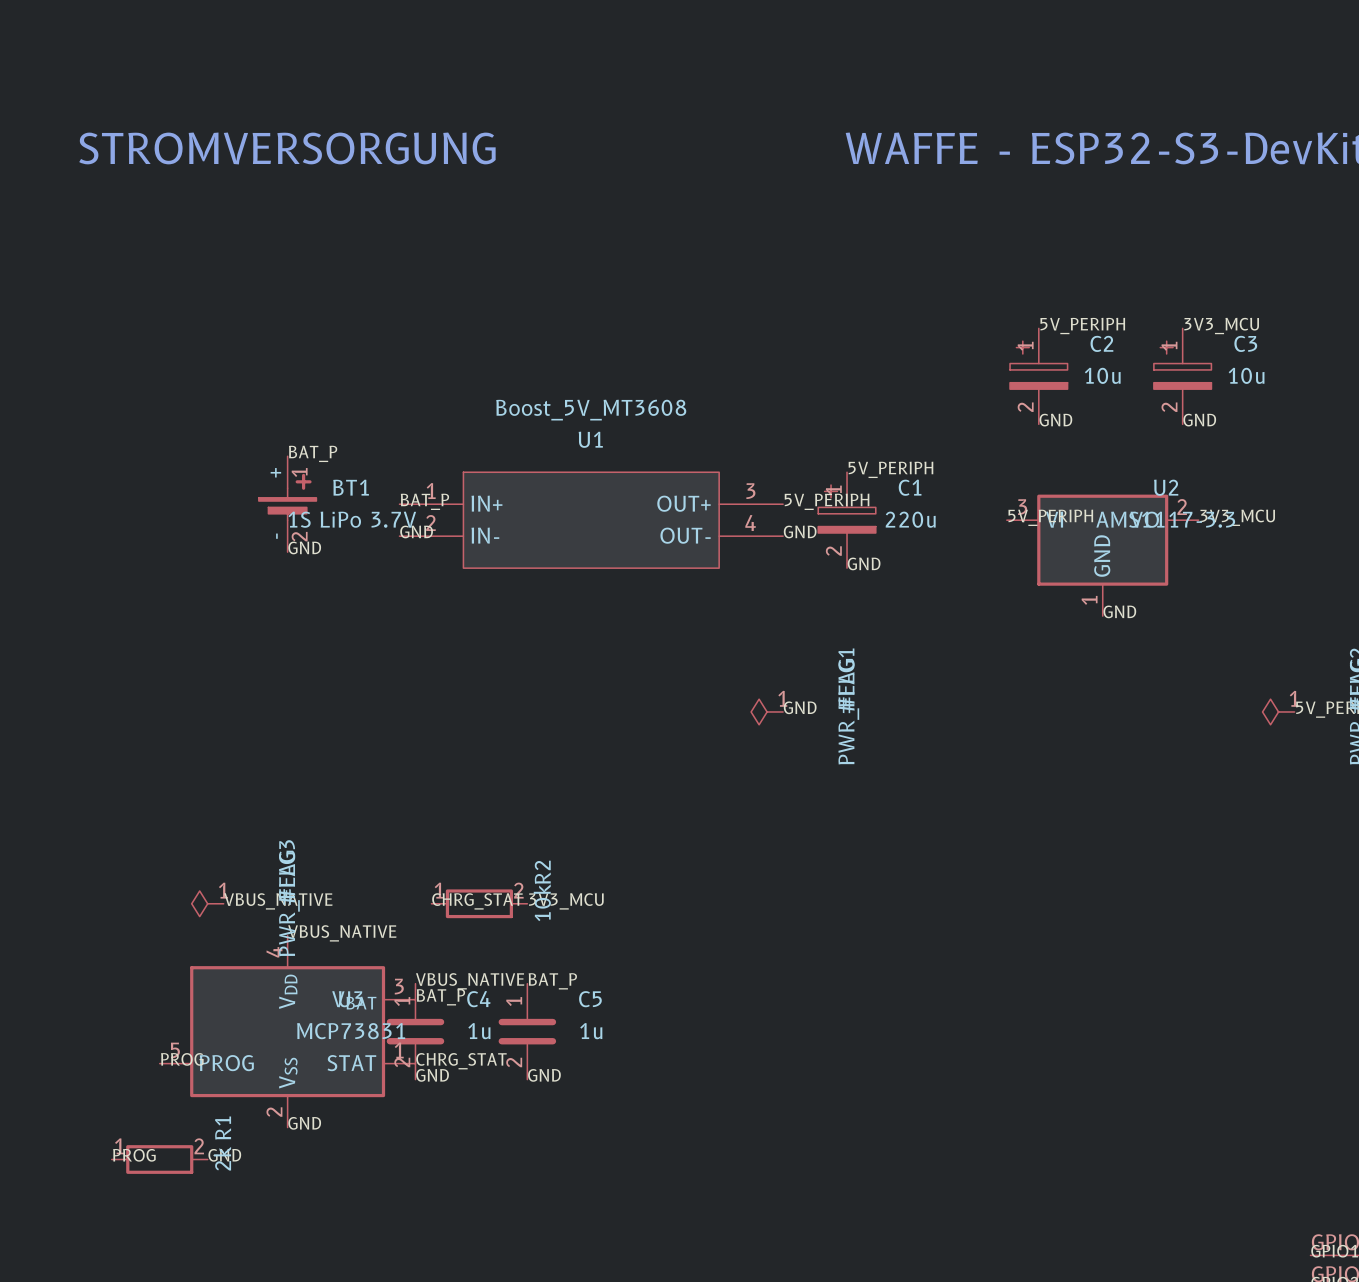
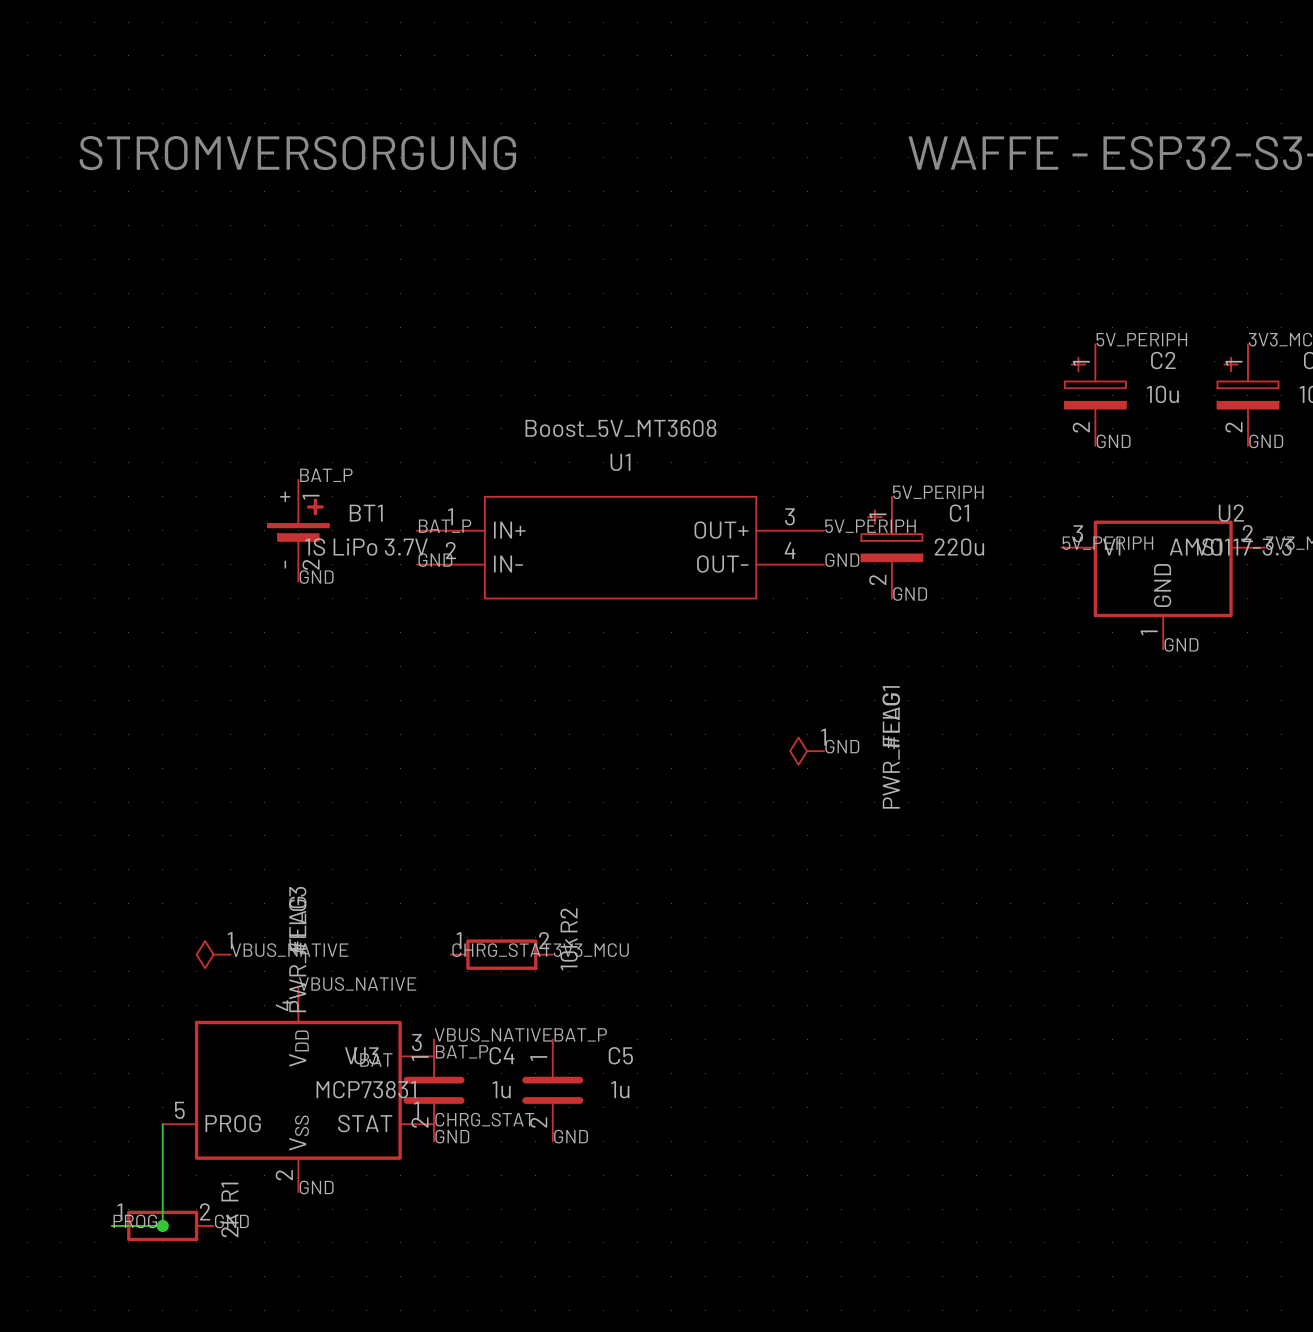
label: PROG (182, 1059) -> none
wire: none -> (162, 1124) (162, 1225) (111, 1225)
junction: none -> (162, 1225)

